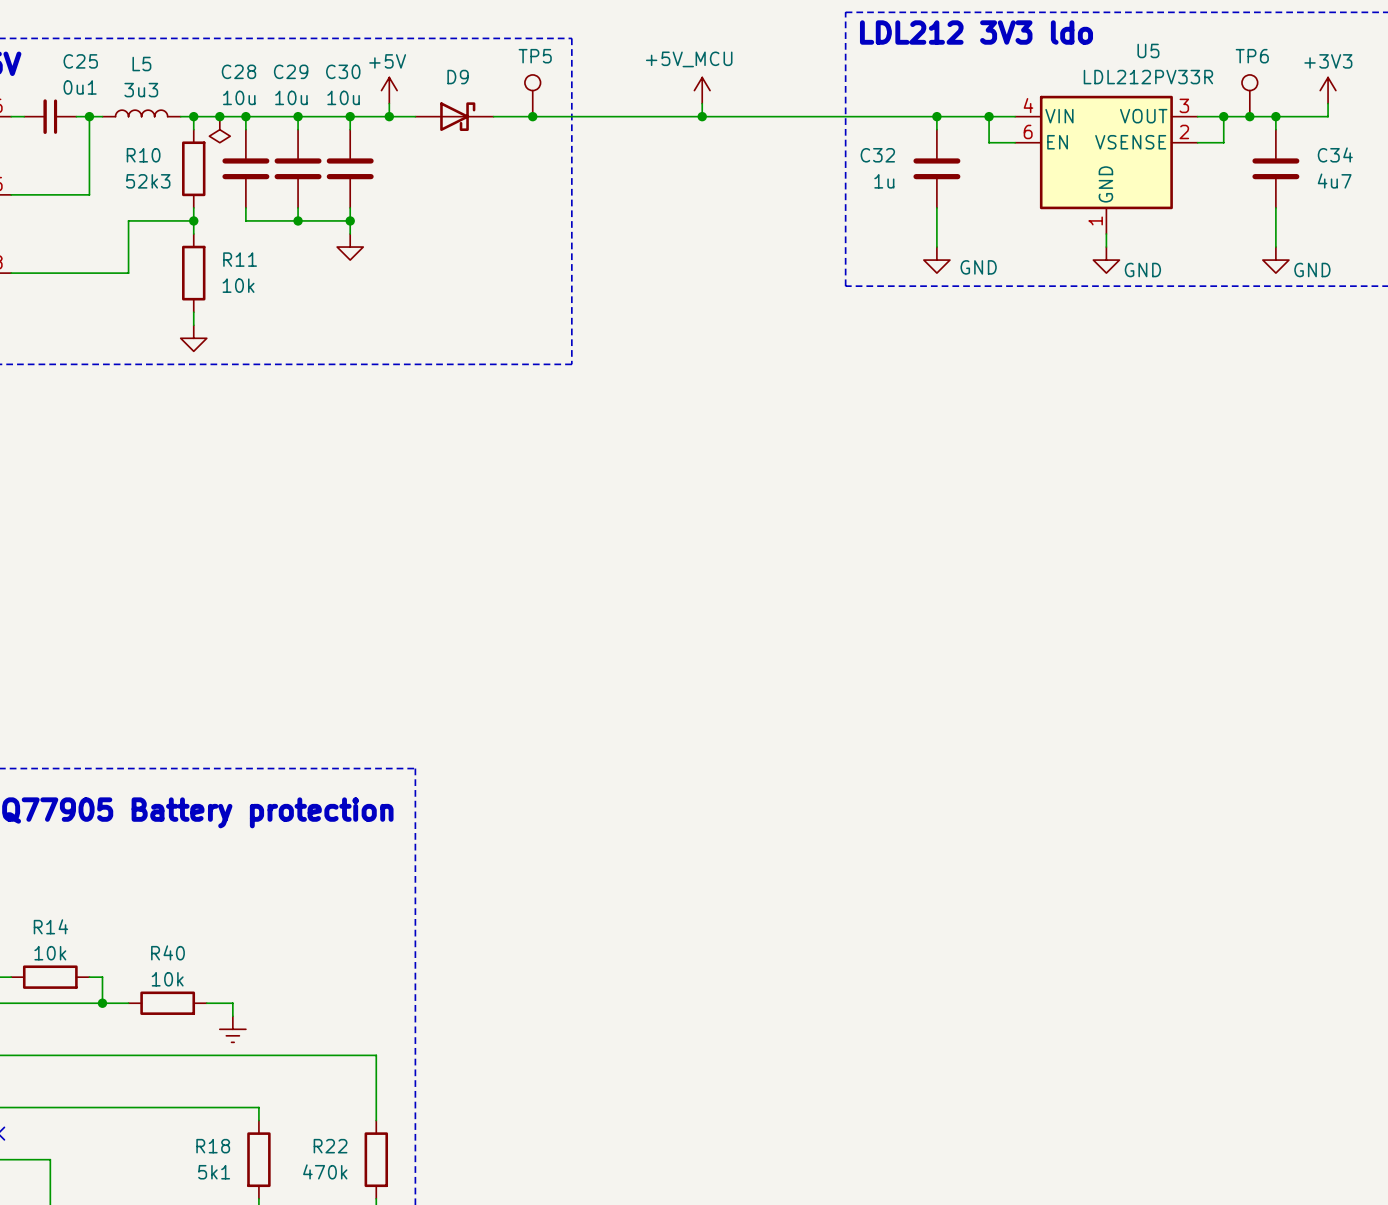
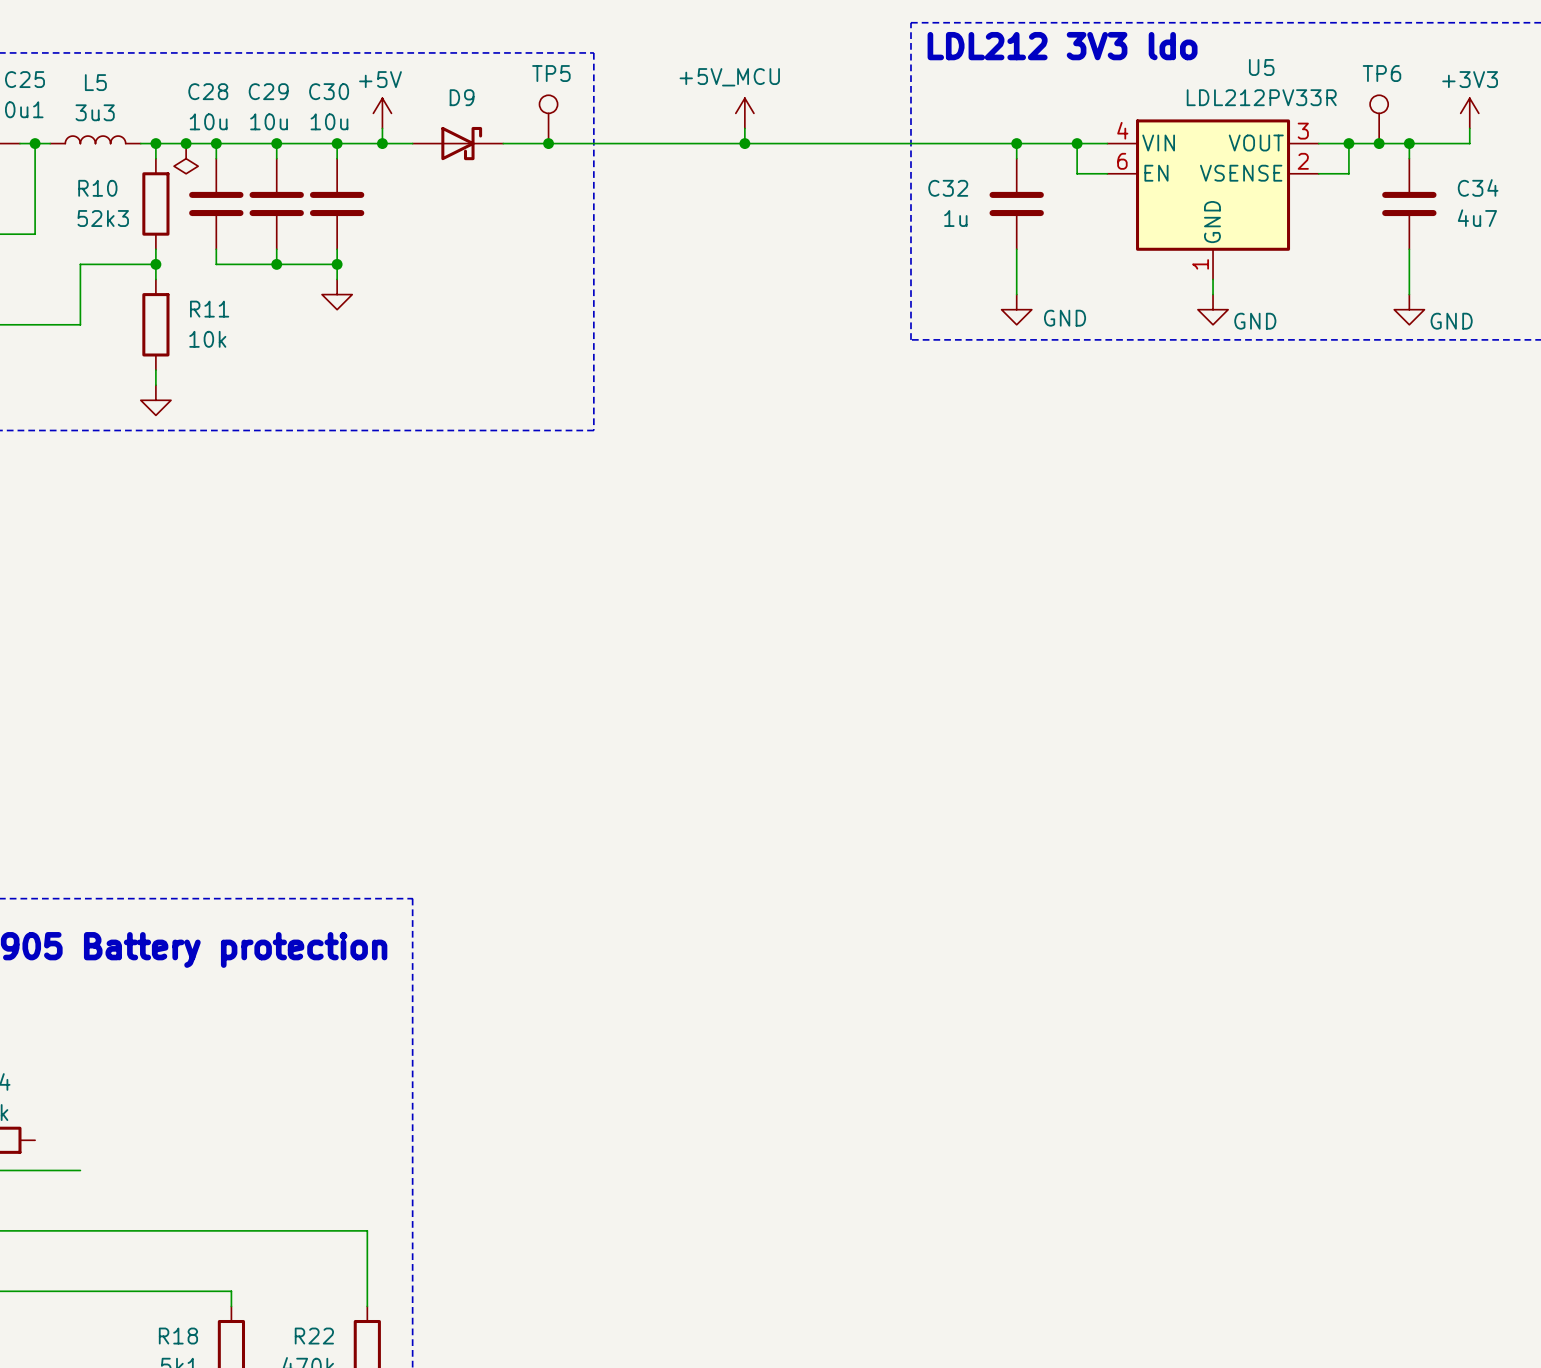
wire: (89, 977) (102, 977) (102, 1003) -> none
junction: (102, 1003) -> none
R40: 10k (167, 1003) -> none
wire: (206, 1003) (232, 1003) (232, 1016) -> none
power symbol: (232, 1029) -> none

